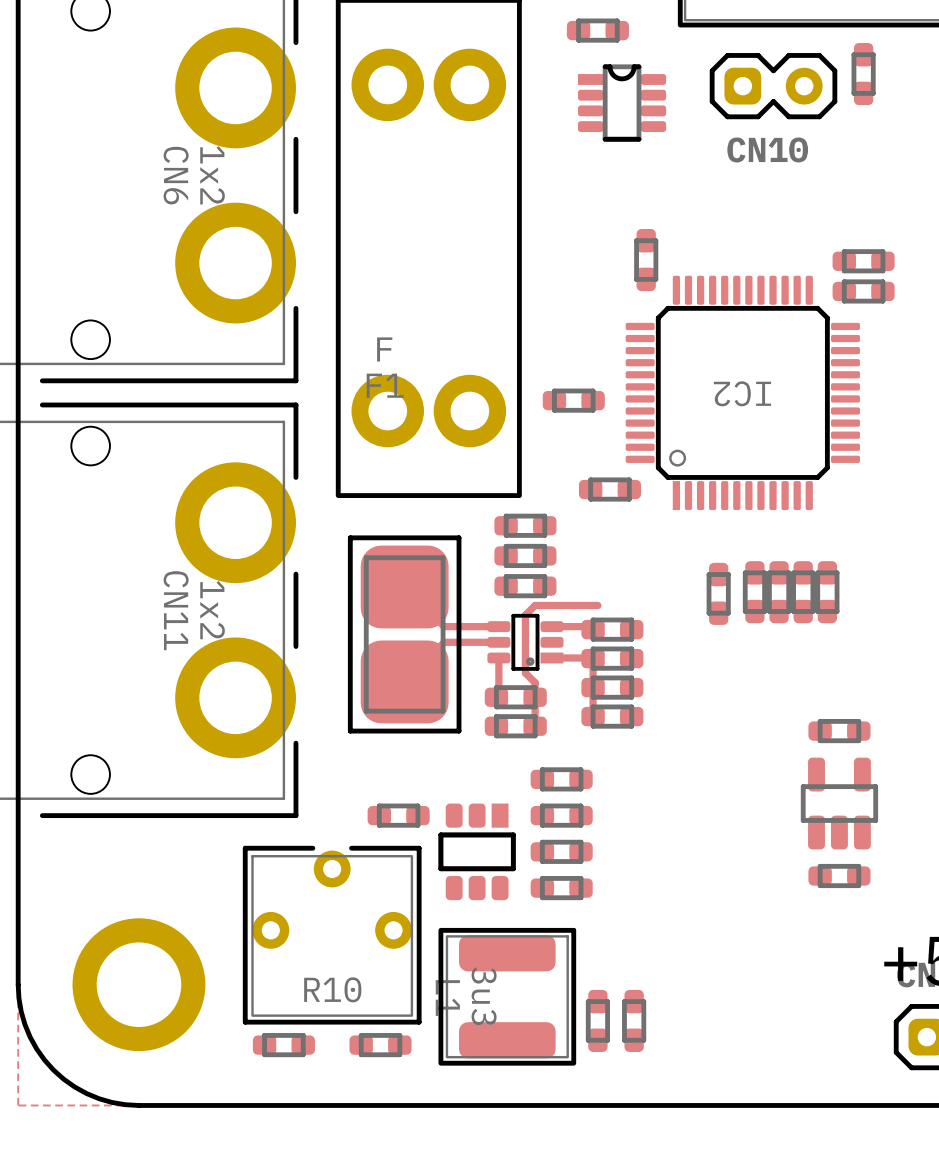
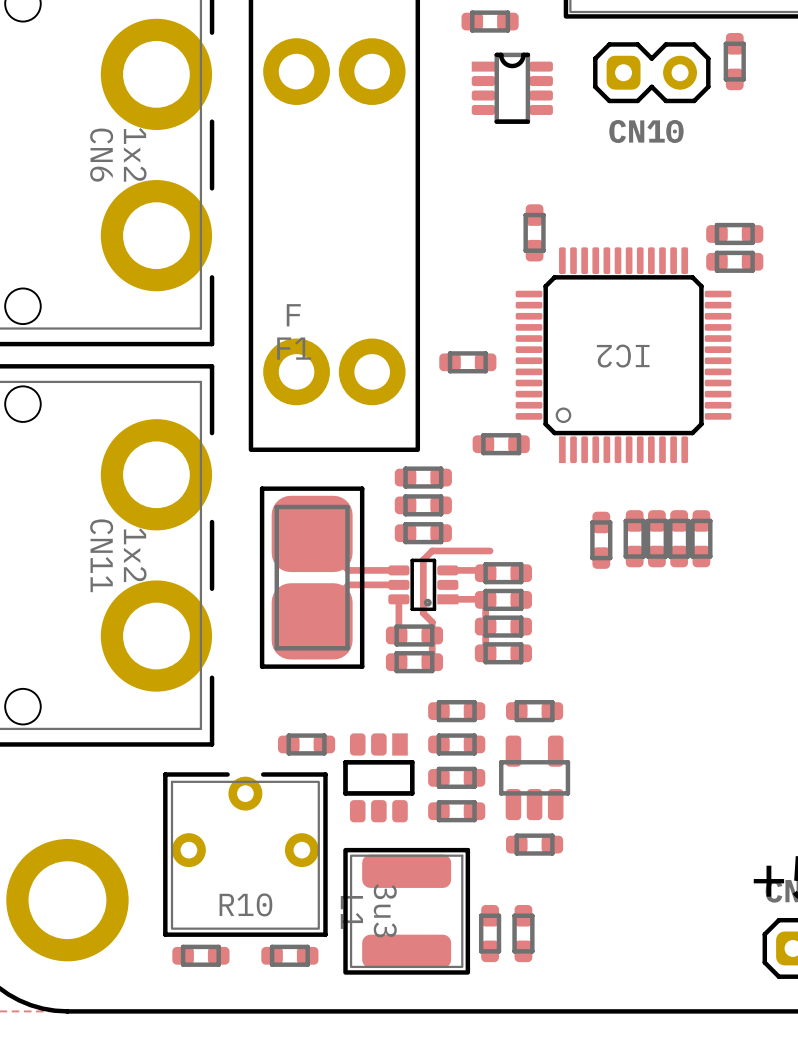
part: (839, 731) -> none
part: none -> (534, 711)
part position: (839, 803) -> (534, 777)
part: (839, 876) -> none
part: none -> (534, 844)

